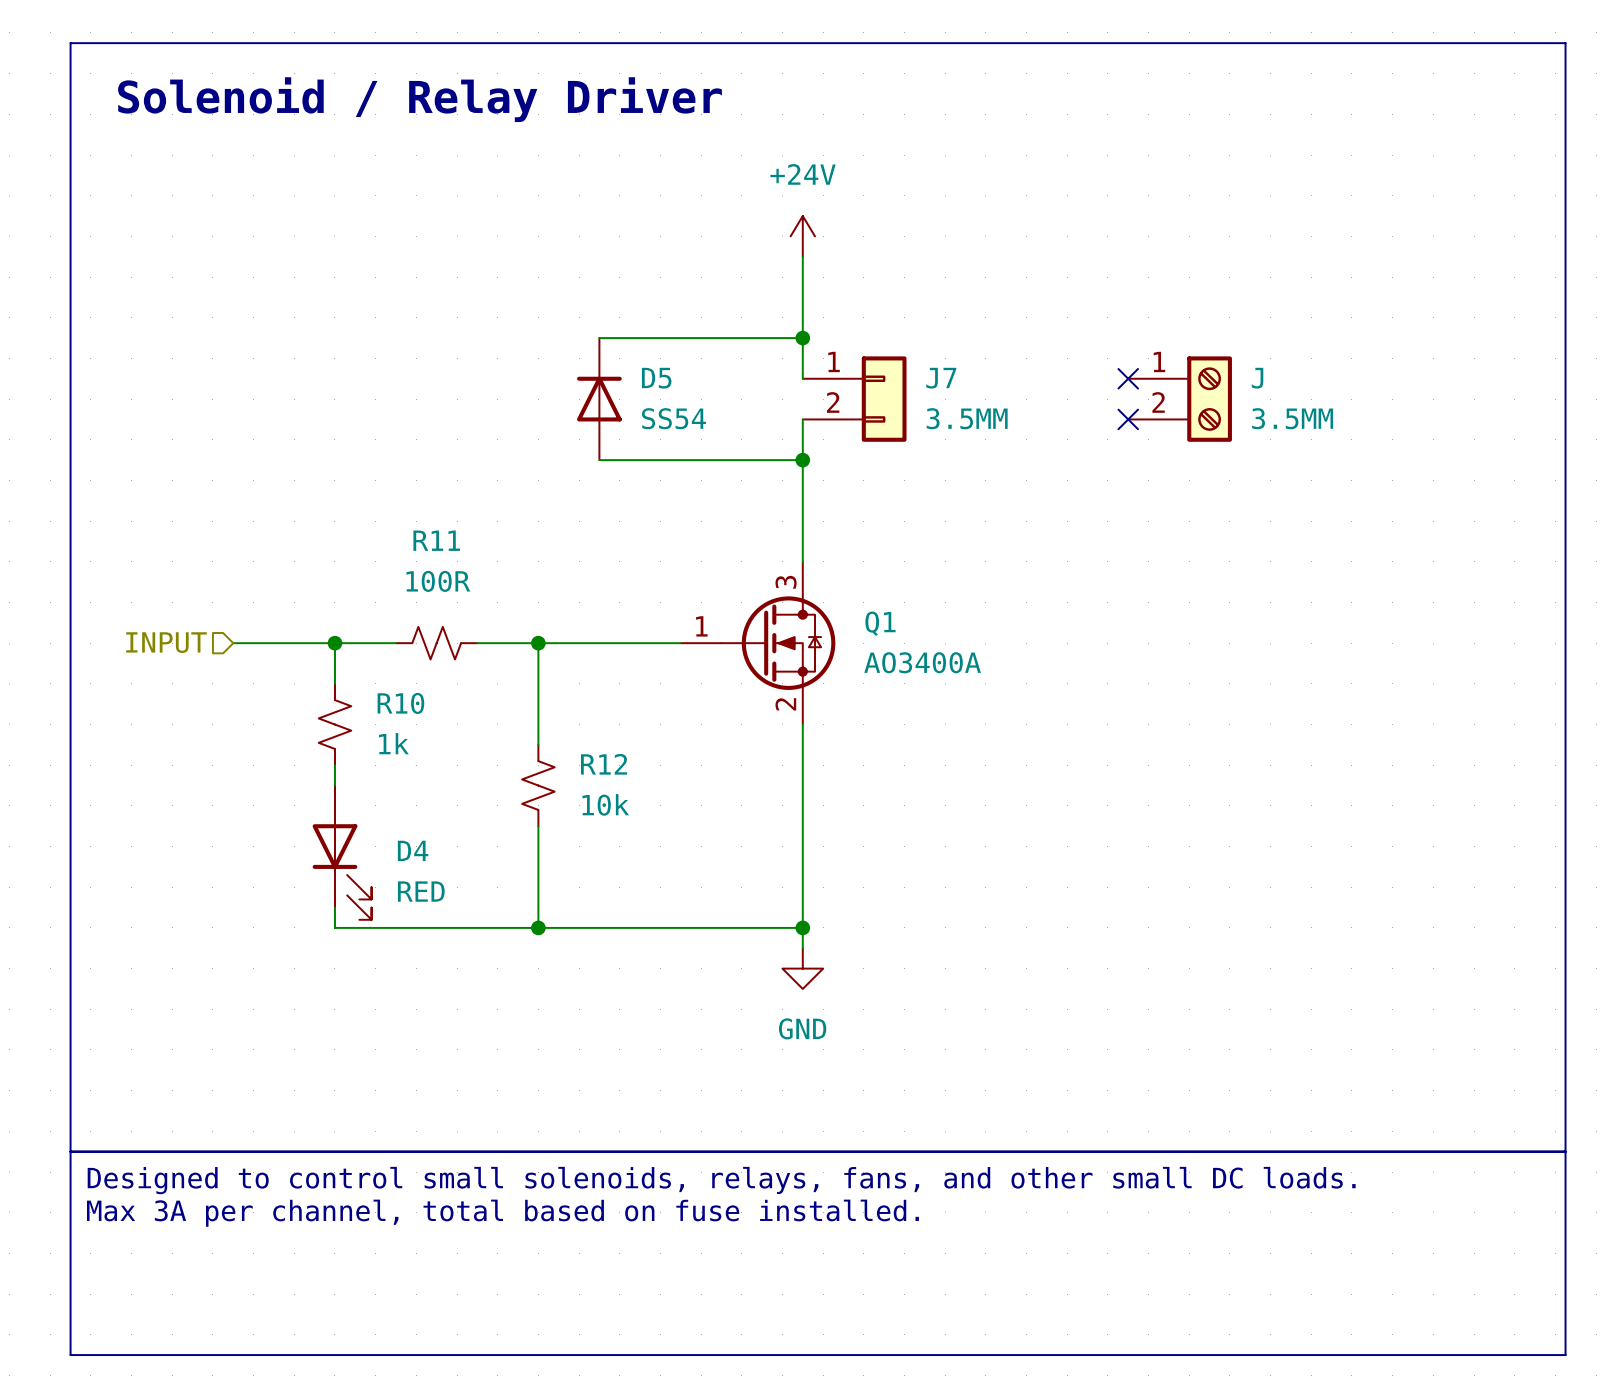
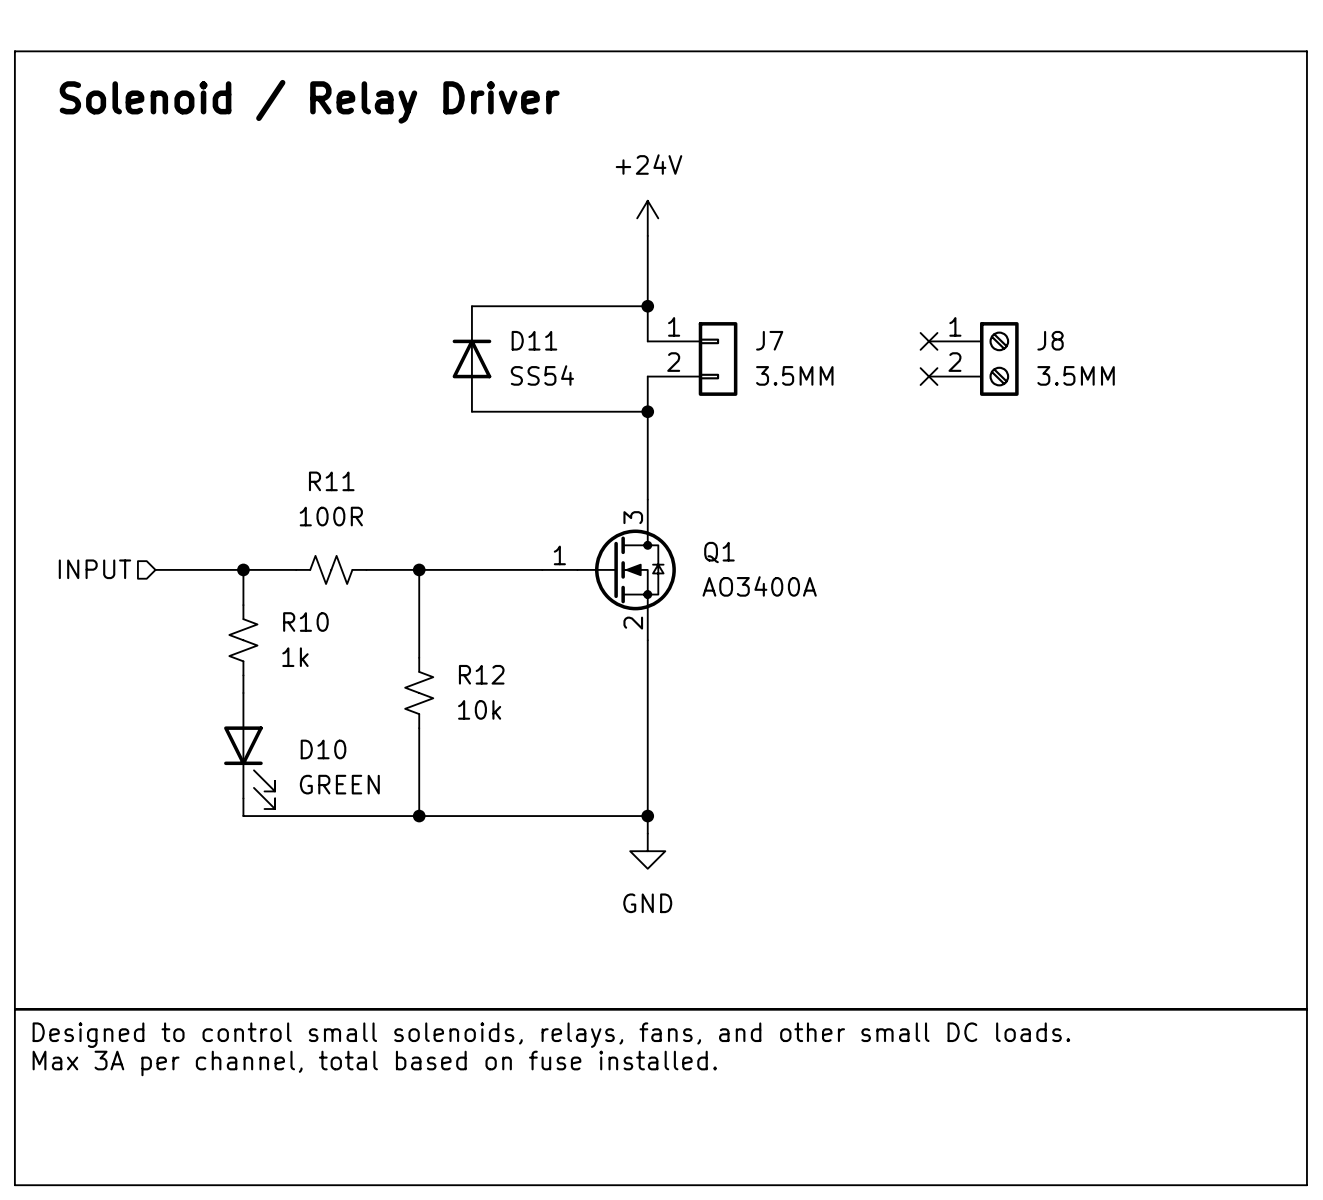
D5 name: D5 (656, 378) -> D11 (534, 340)
J name: J (1257, 378) -> J8 (1050, 340)
D4 name: D4 (413, 850) -> D10 (323, 749)
D4 value: RED (421, 891) -> GREEN (339, 784)

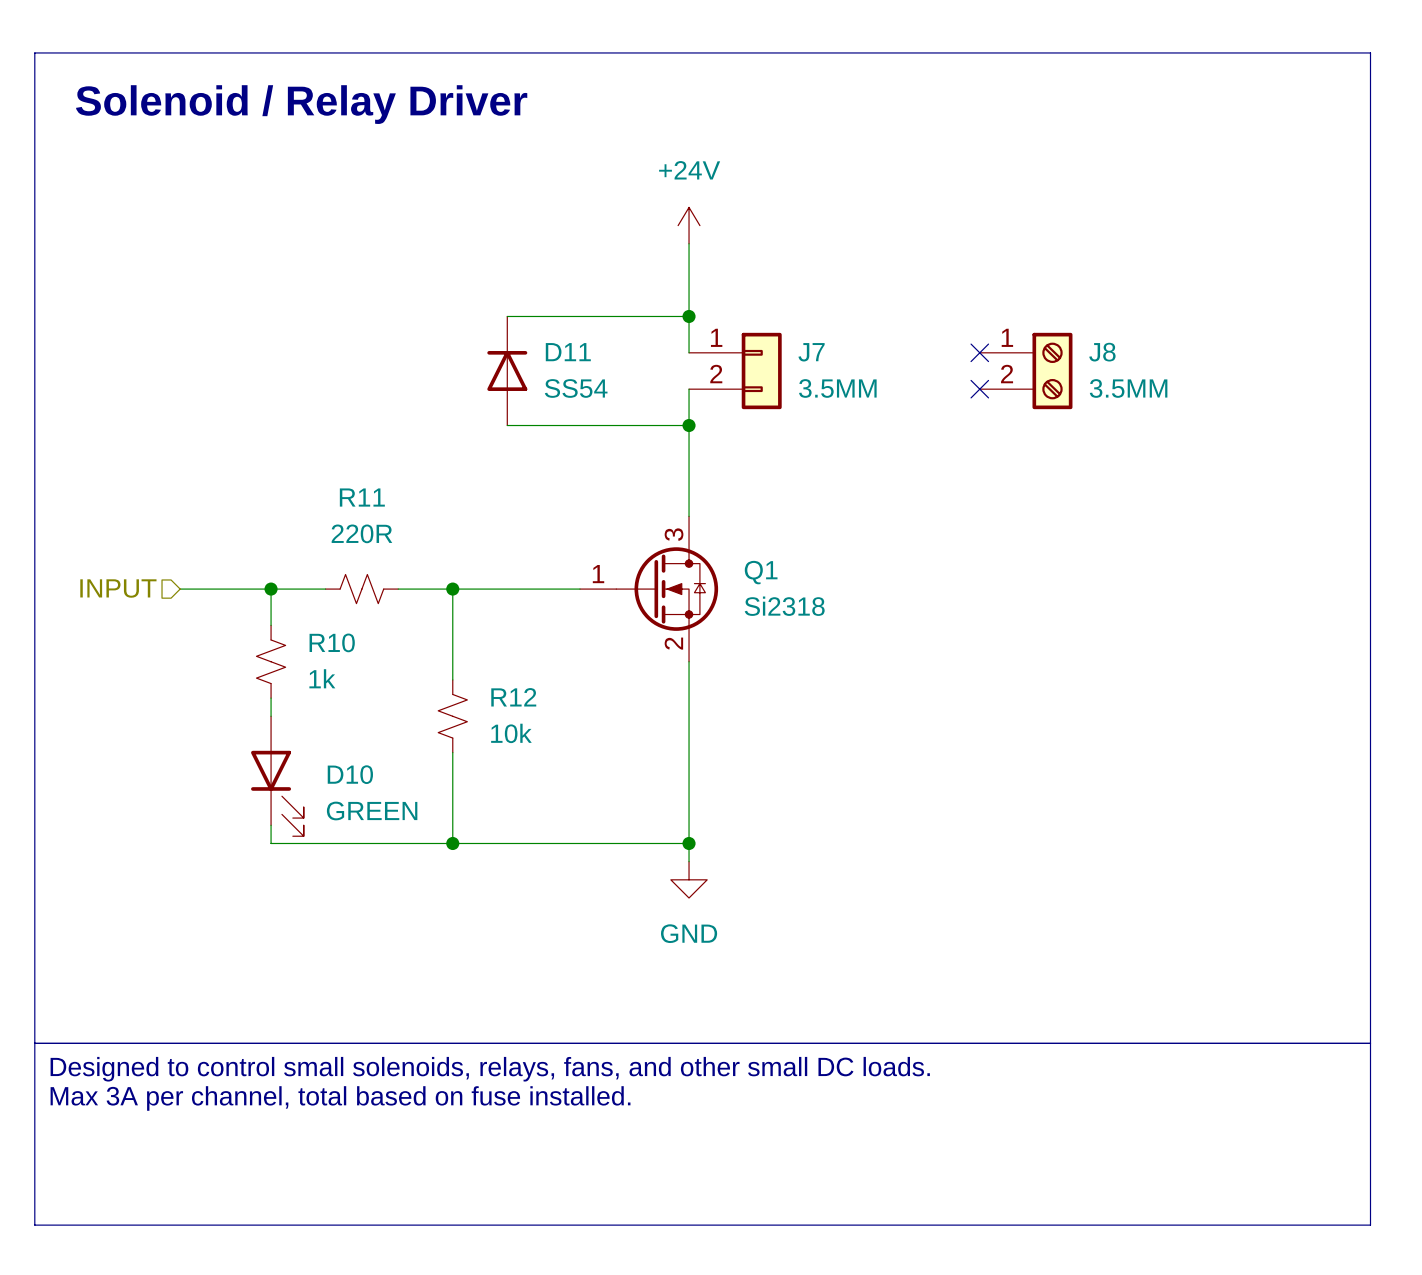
R11 value: 100R (331, 516) -> 220R (361, 533)
Q1 value: AO3400A (759, 586) -> Si2318 (784, 606)

